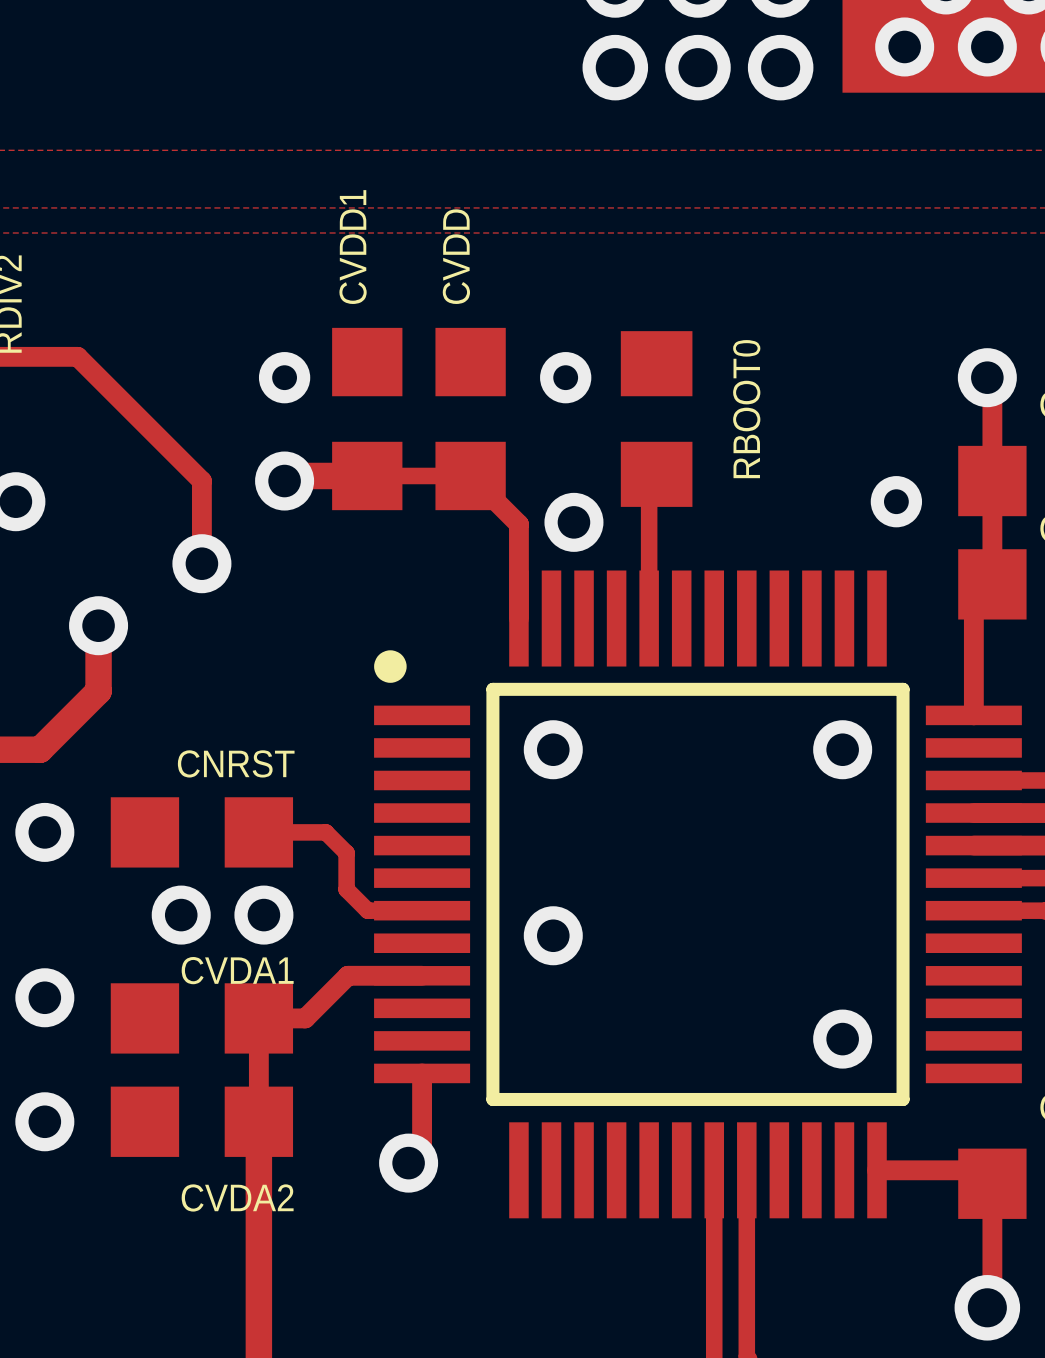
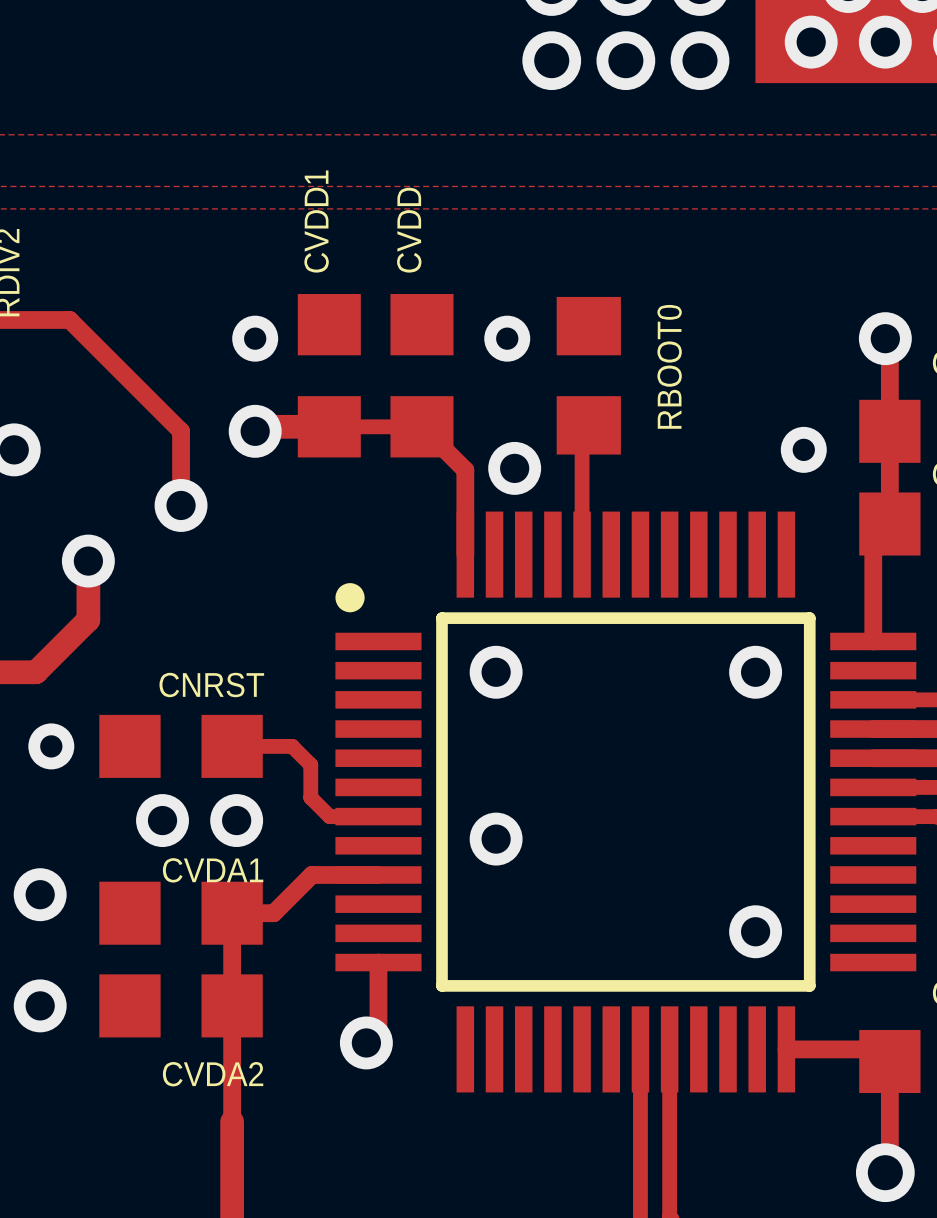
via size: [15, 802, 75, 862] -> [28, 723, 75, 770]
track width: thick (258, 1121) (258, 1250) -> thin (232, 1005) (232, 1121)

